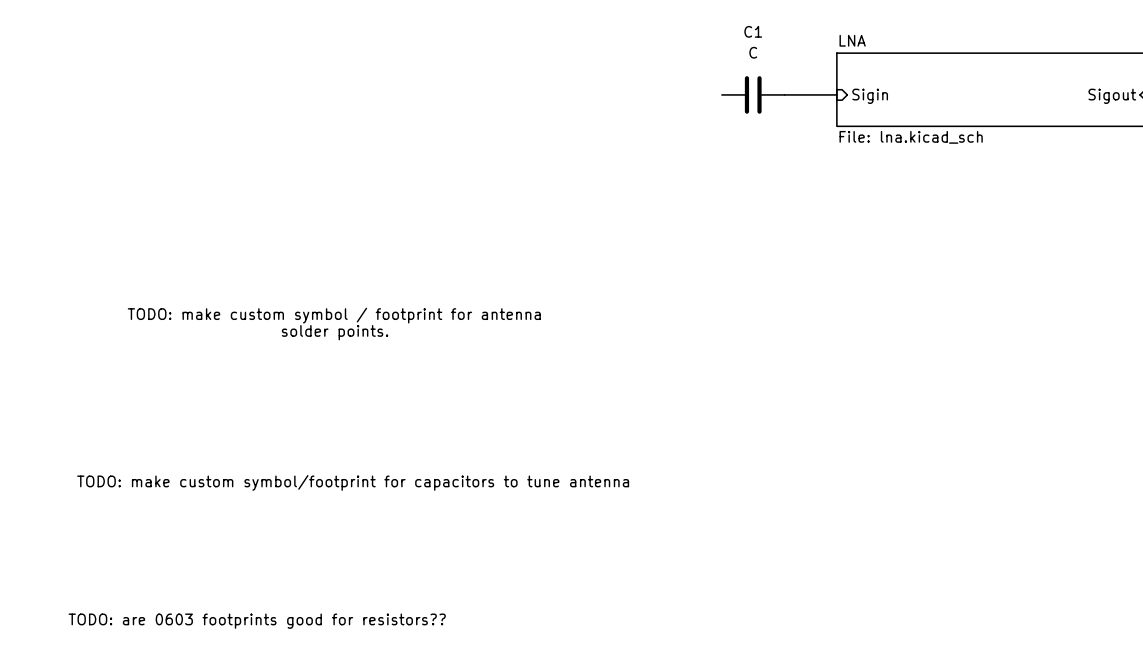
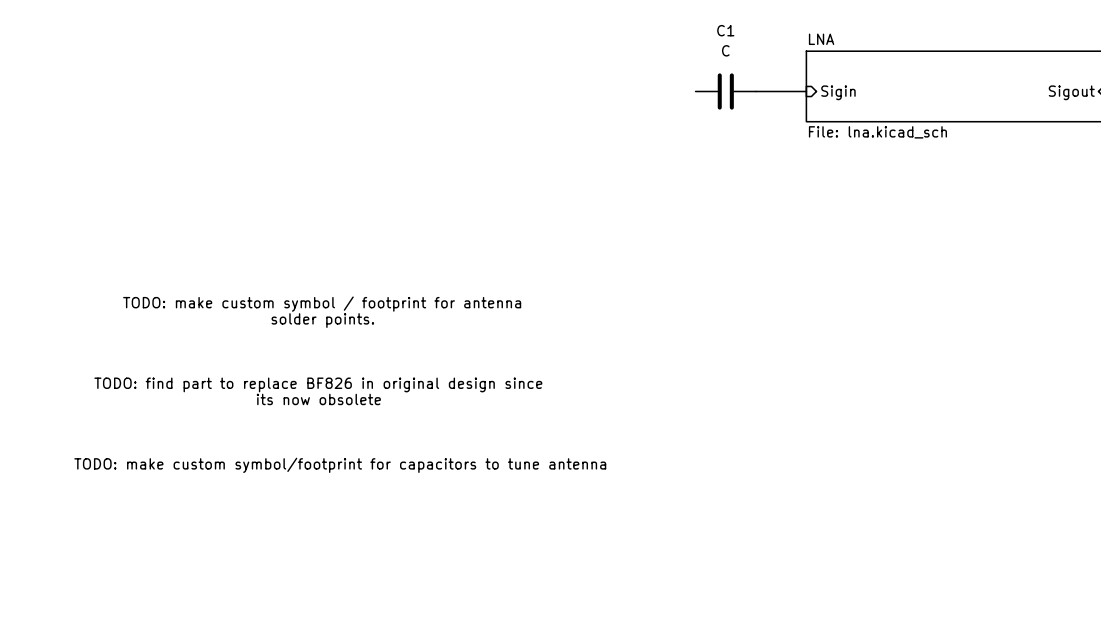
text: none -> TODO: find part to replace BF826 in original design since (318, 384)
text: none -> its now obsolete (318, 399)
text: TODO: are 0603 footprints good for resistors?? (257, 621) -> none

